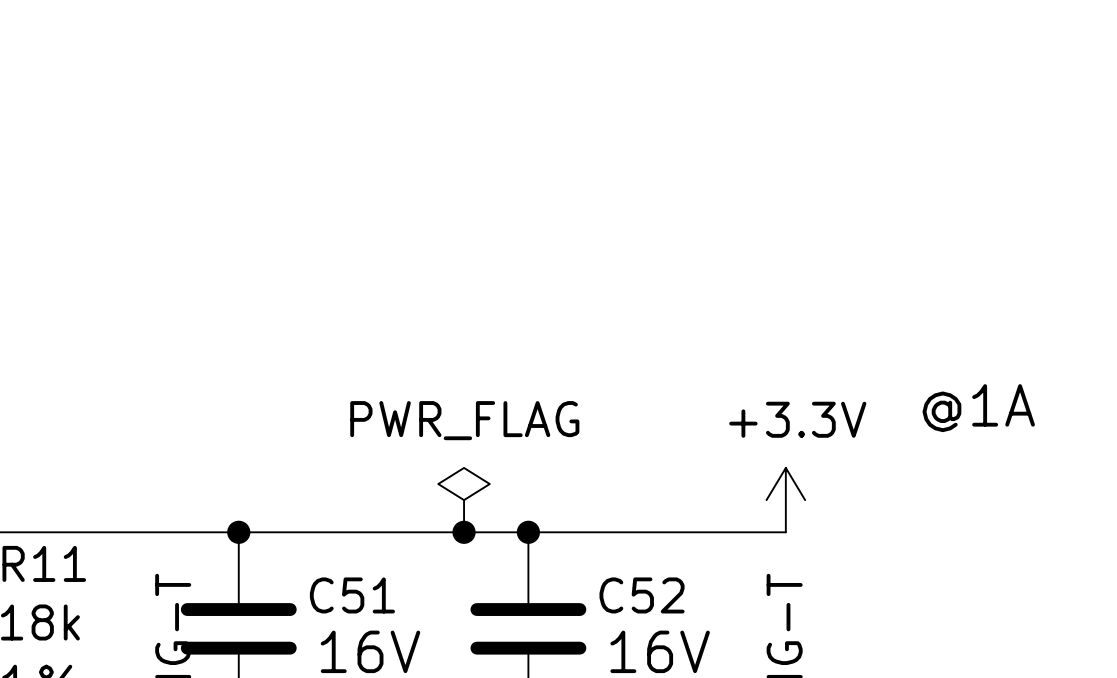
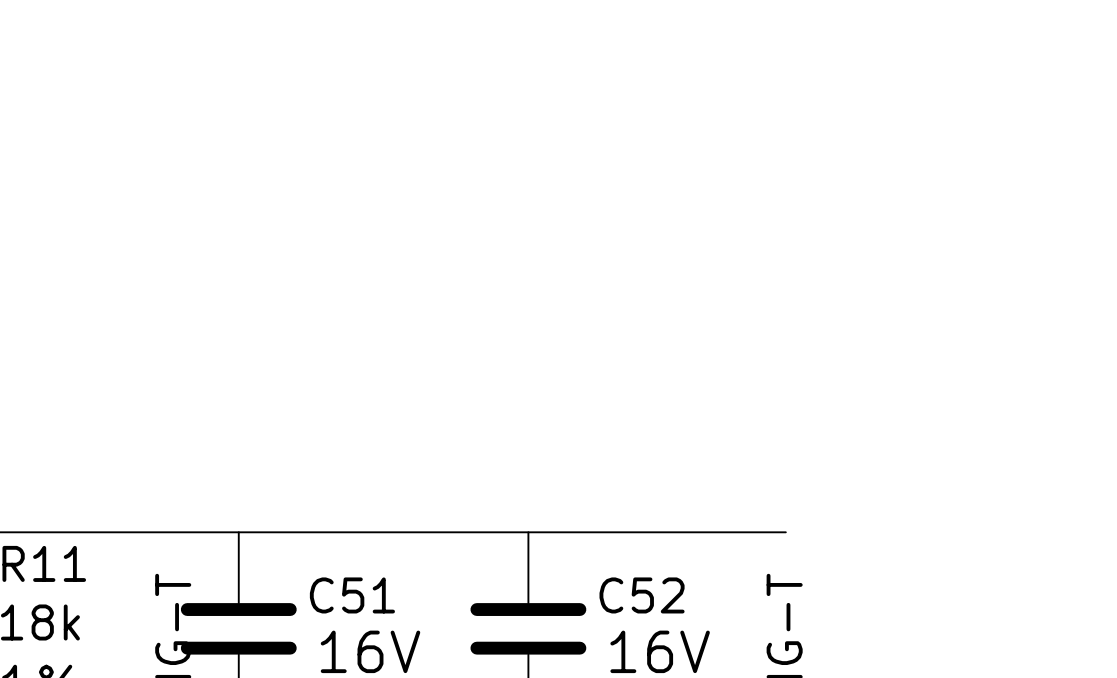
text: @1A (978, 408) -> none
power symbol: PWR_FLAG (464, 500) -> none
power symbol: +3.3V (785, 500) -> none
junction: (238, 532) -> none
junction: (464, 532) -> none
junction: (528, 532) -> none

